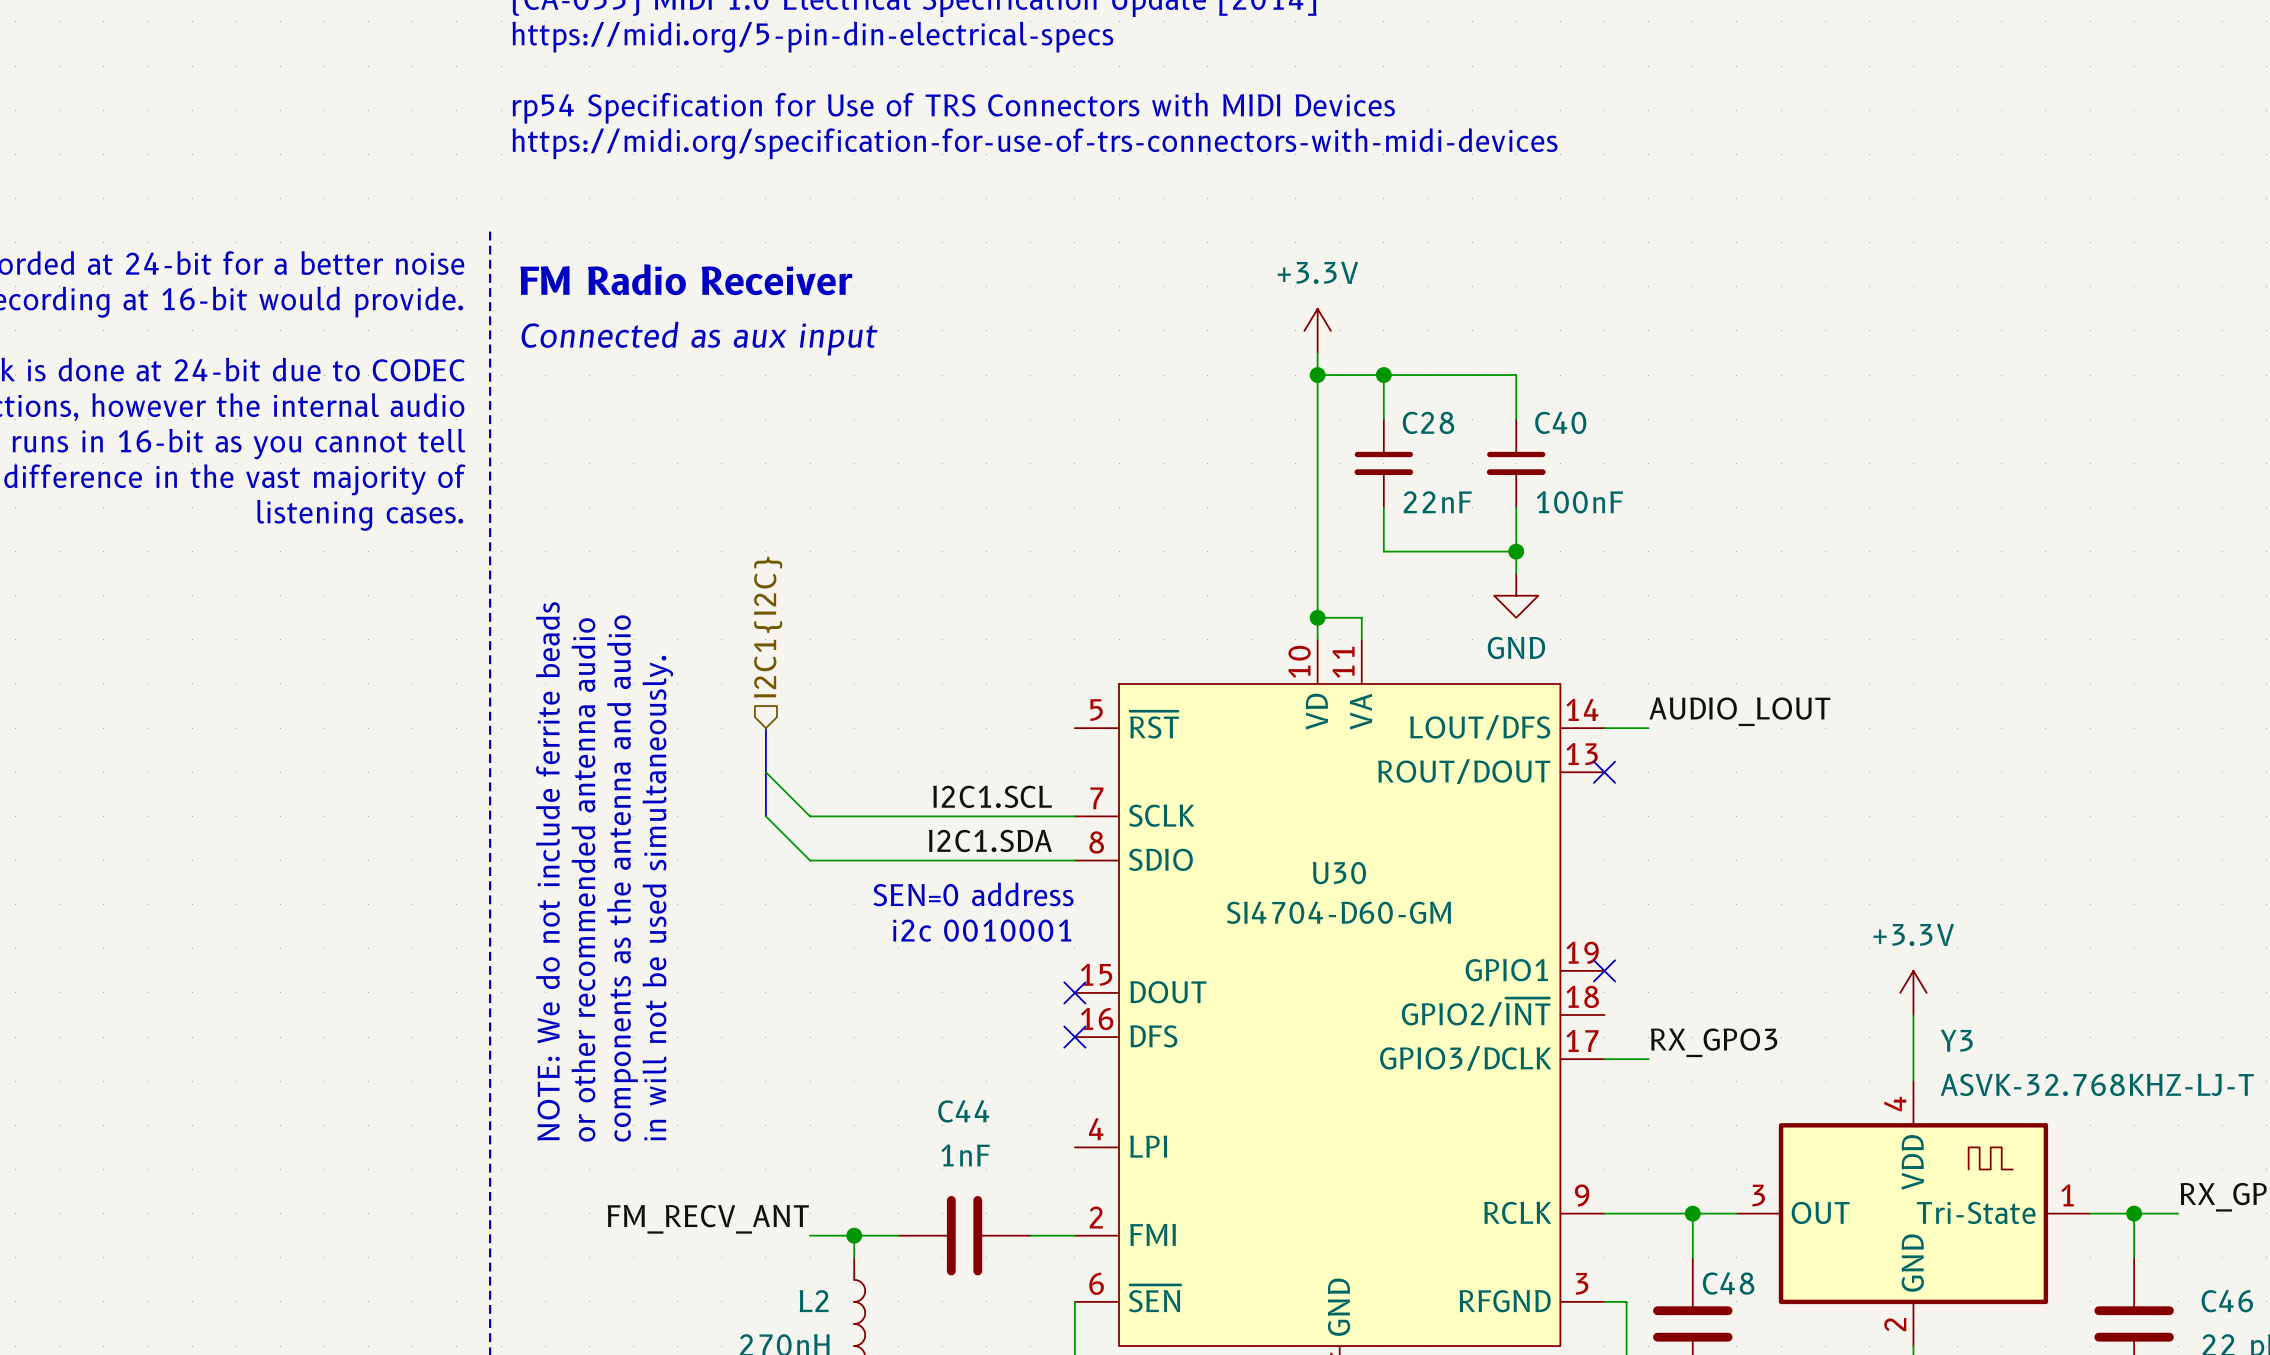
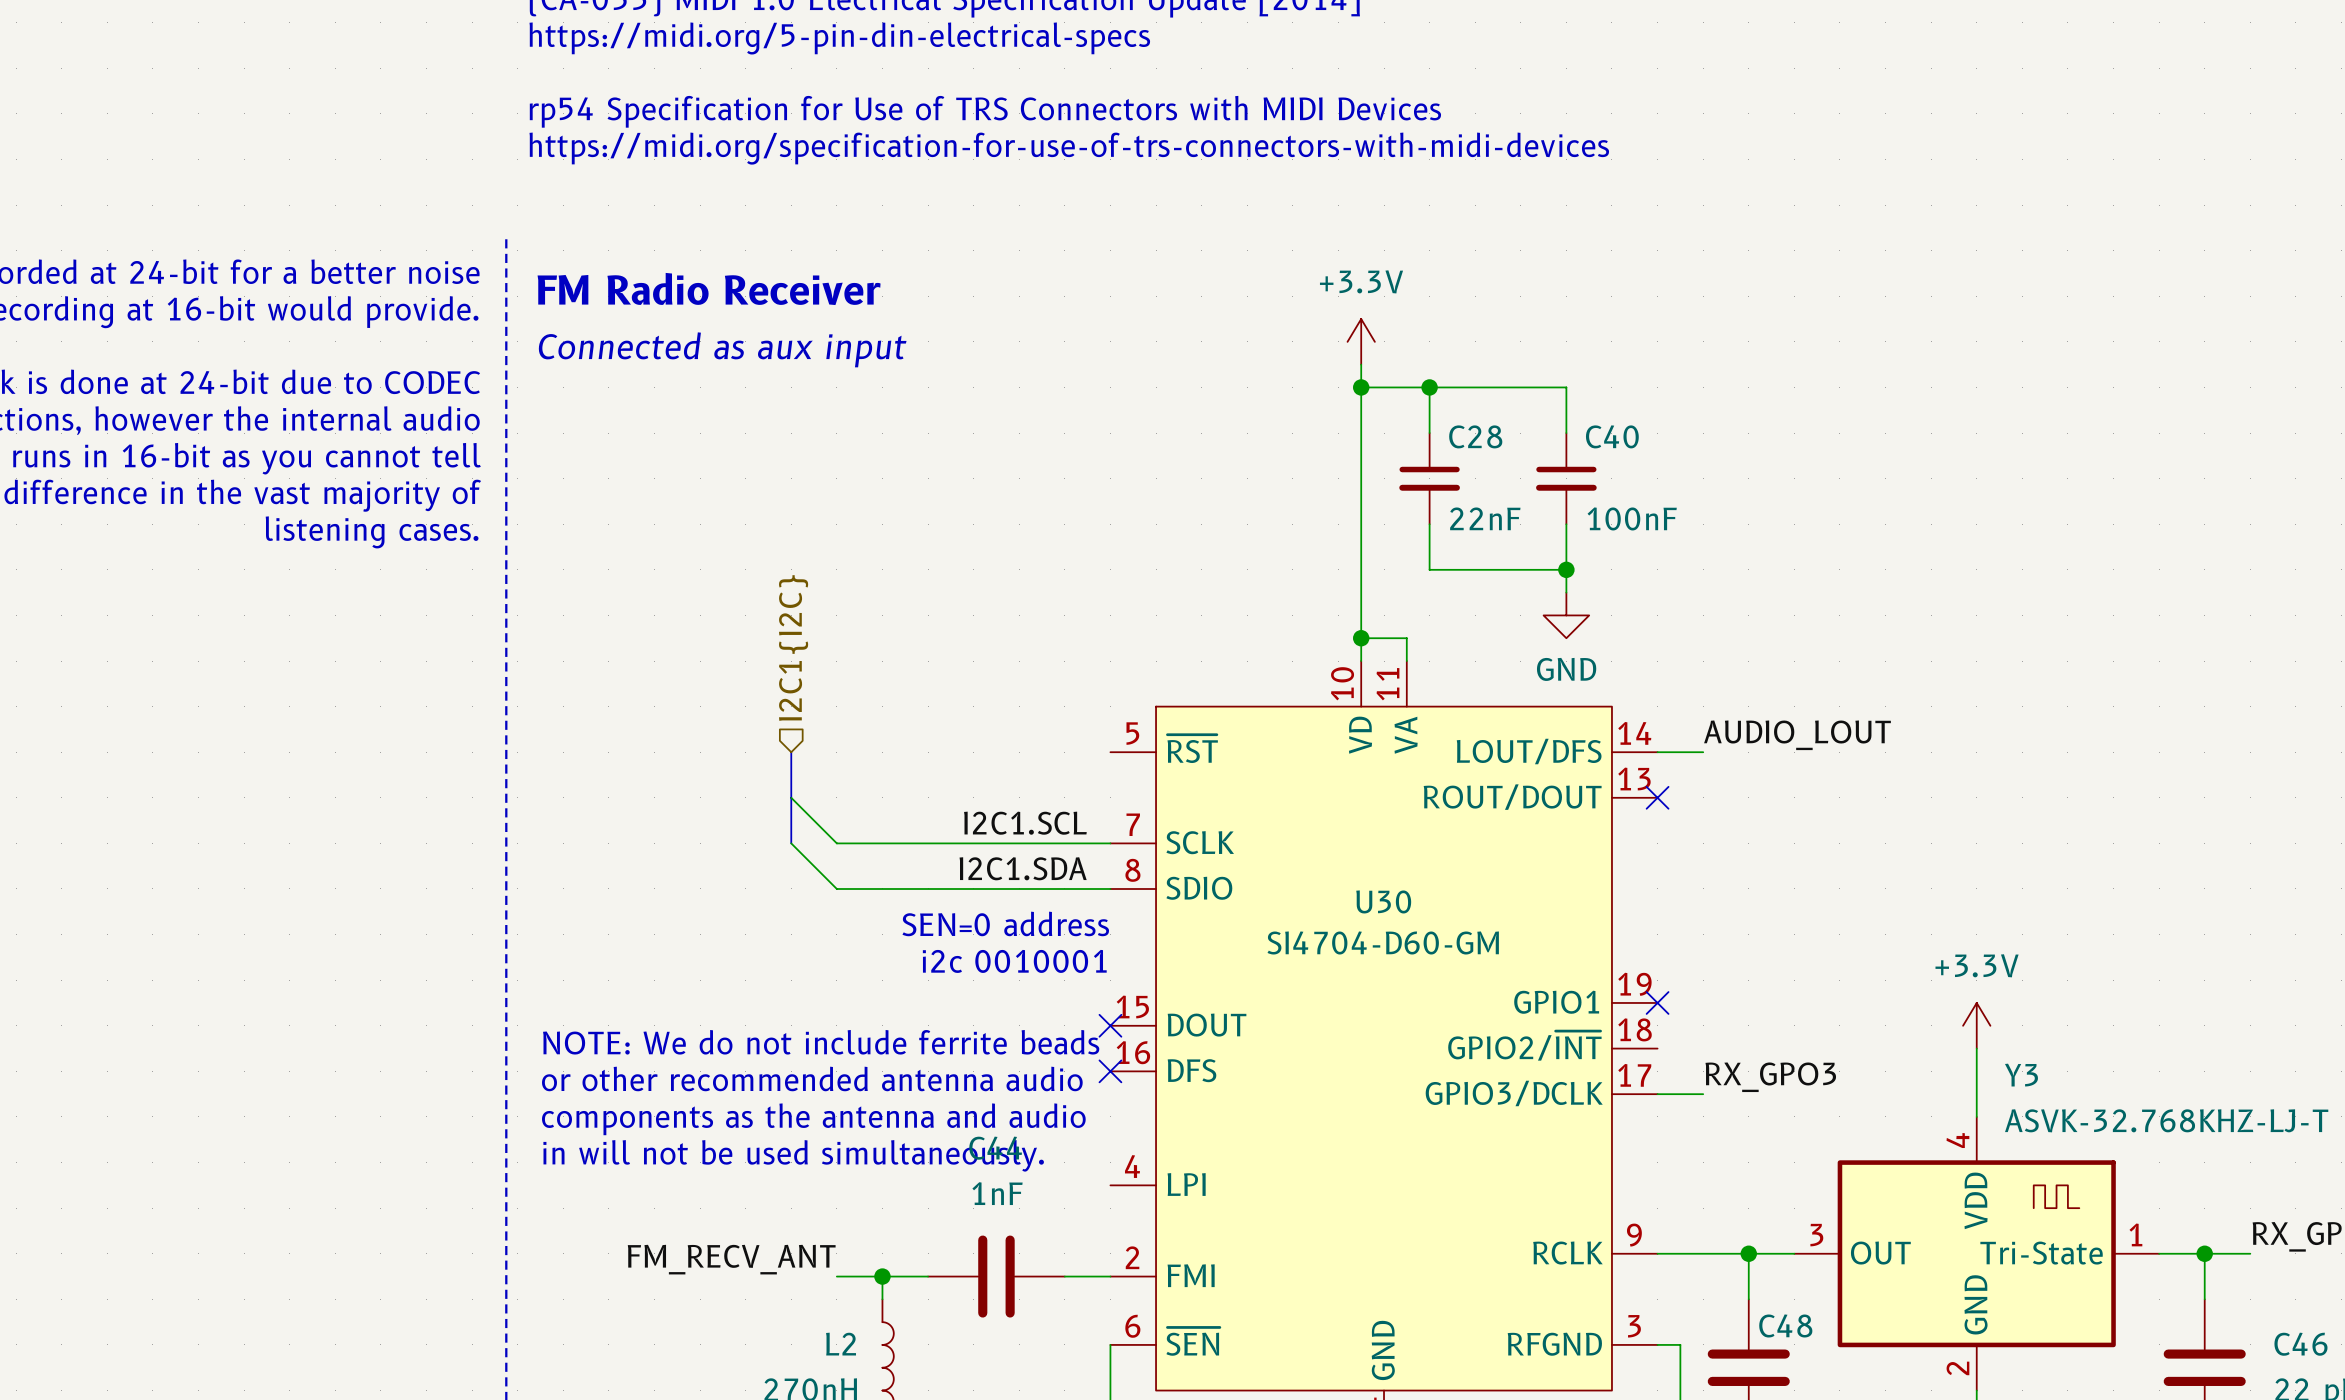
text rotation: 0° (547, 871) -> 90° clockwise (821, 1042)
text rotation: 0° (622, 878) -> 90° clockwise (813, 1119)
text rotation: 0° (583, 879) -> 90° clockwise (812, 1078)
text rotation: 0° (657, 898) -> 90° clockwise (793, 1155)

